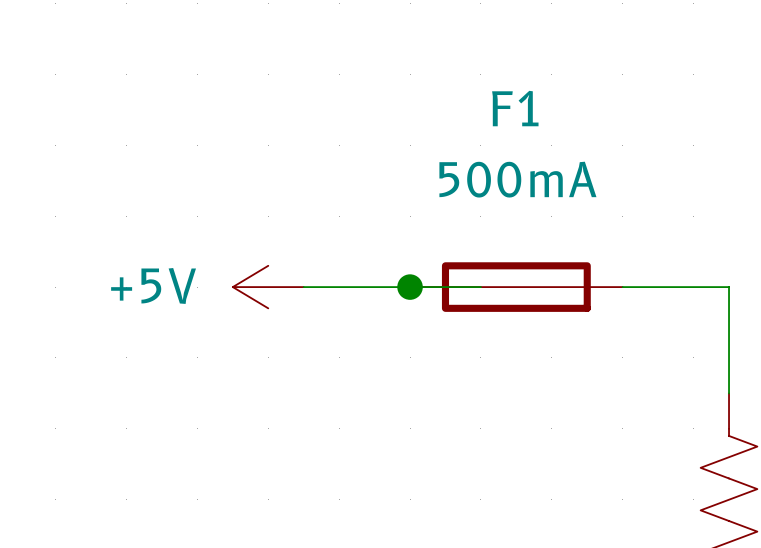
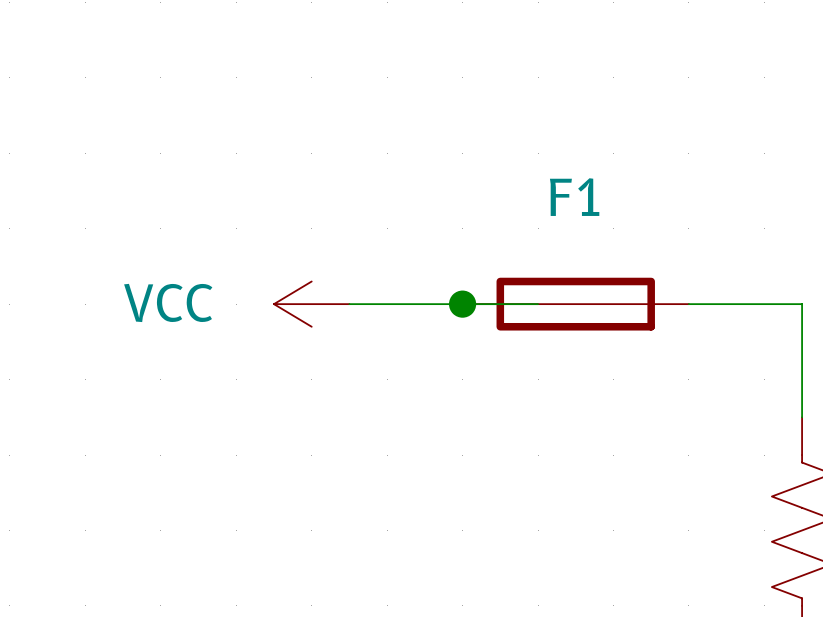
F1 name position: F1 (515, 108) -> F1 (574, 197)
F1 value: 500mA (517, 179) -> none
VCC name: none -> VCC (168, 302)
VCC text: +5V (153, 285) -> none

